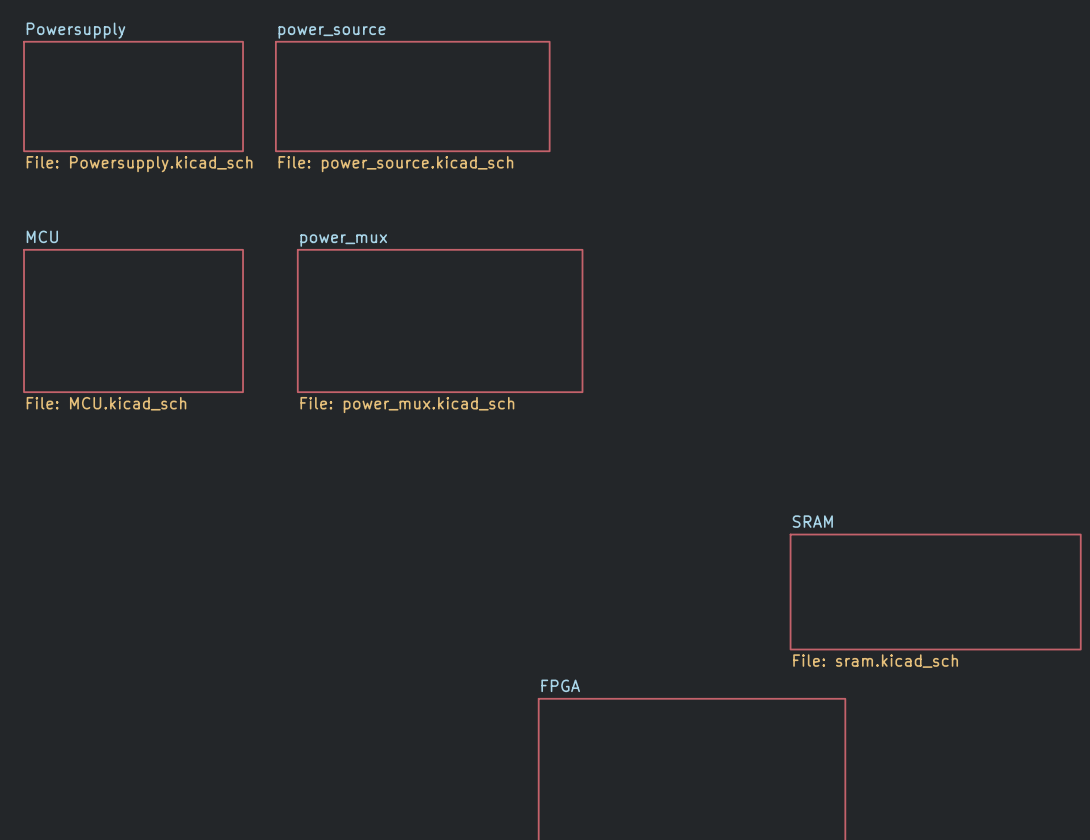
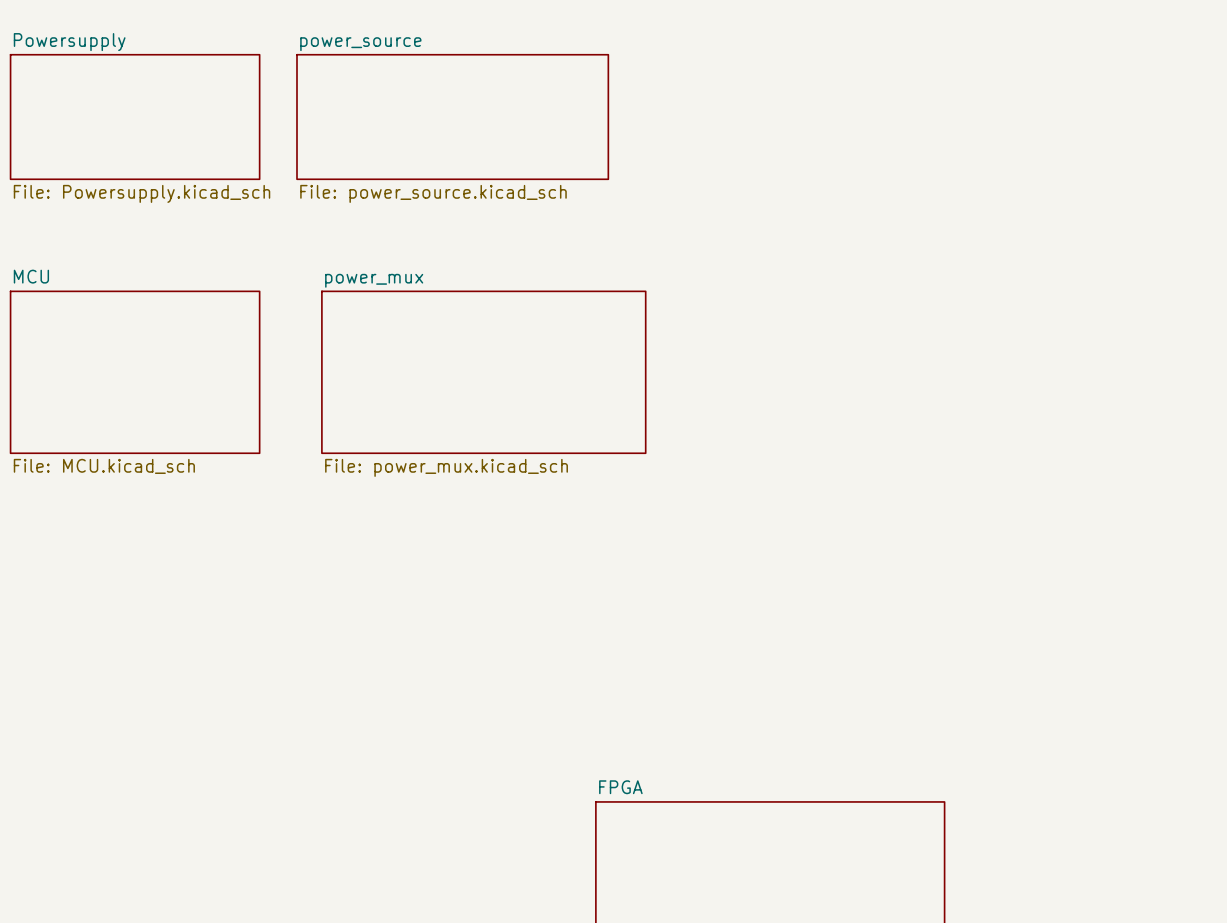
sheet SRAM: File: sram.kicad_sch (935, 592) -> none

